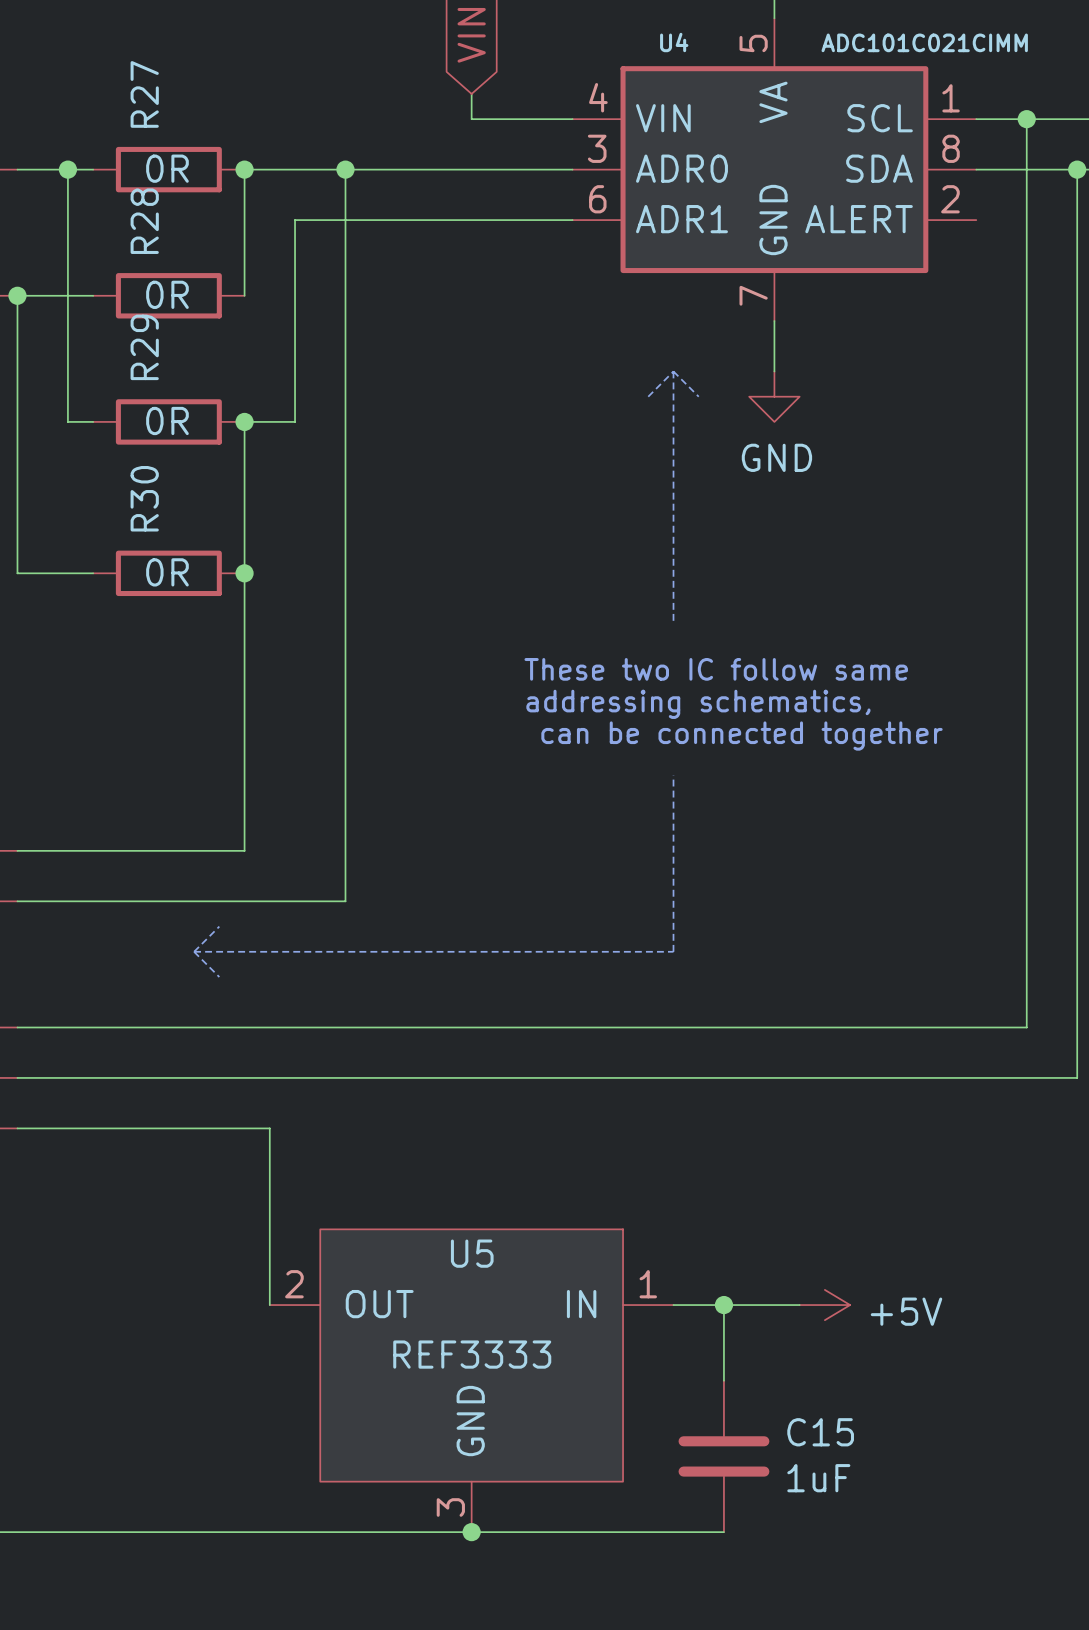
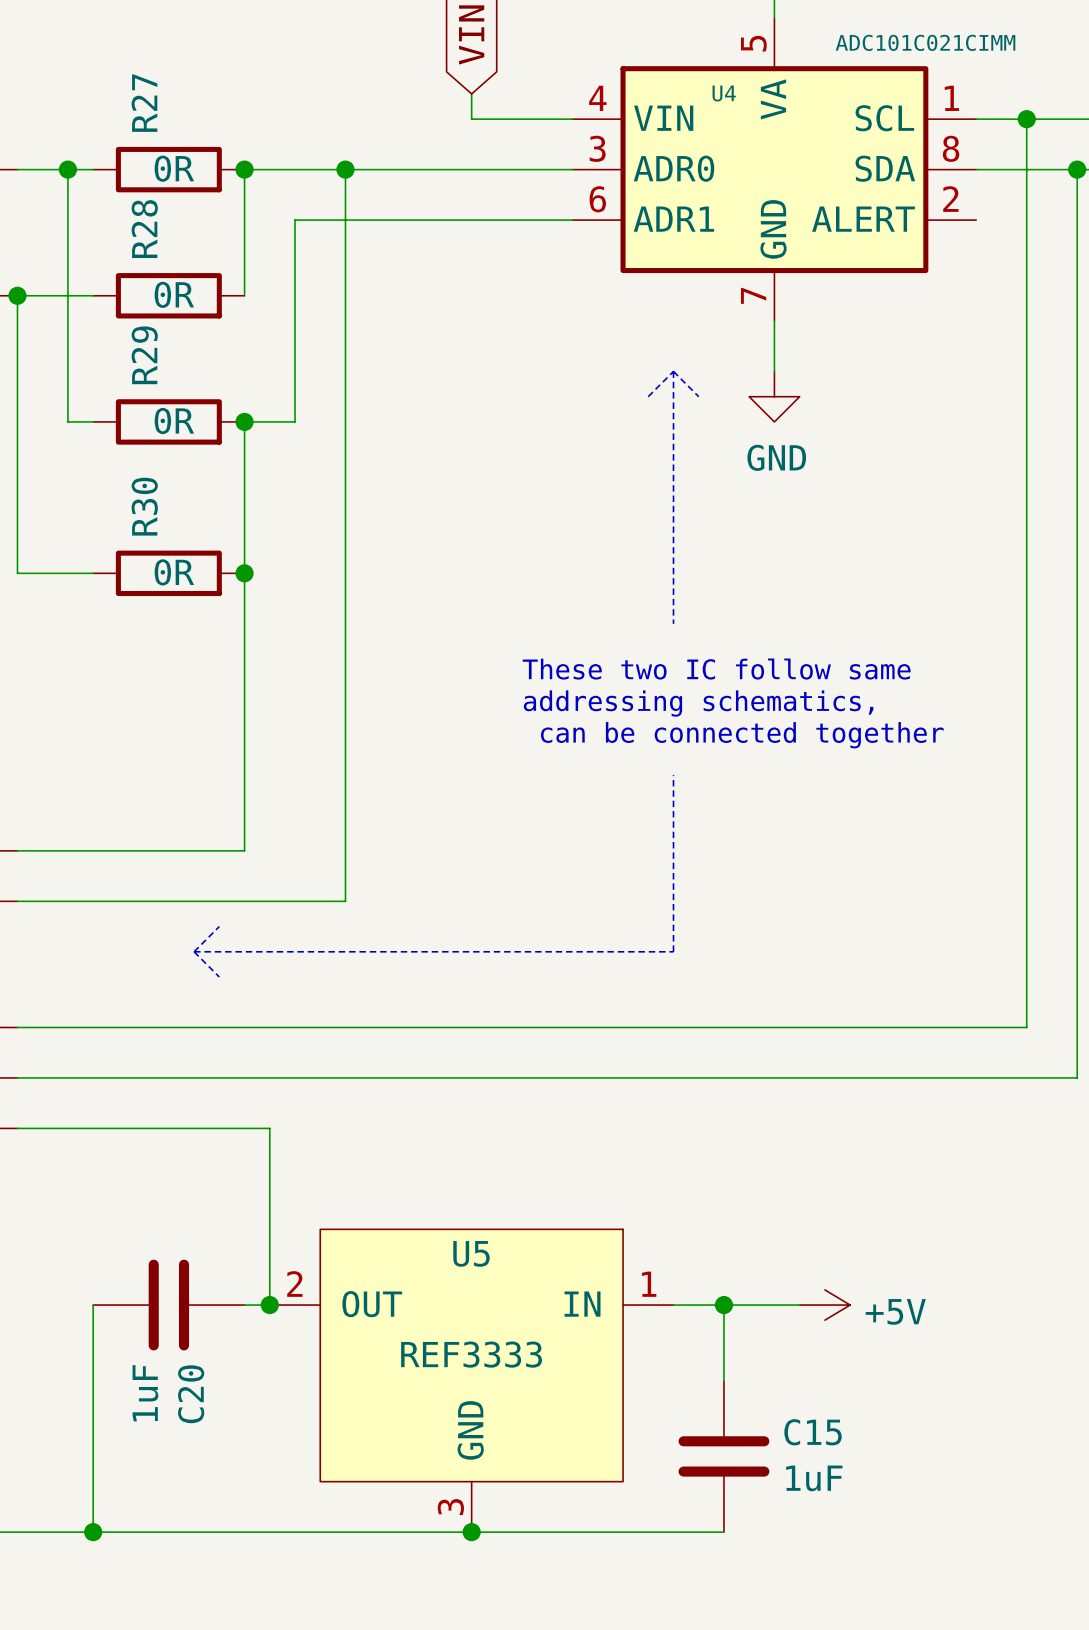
U4 name position: U4 (674, 42) -> U4 (724, 93)
wire: none -> (93, 1305) (93, 1532)
C20: none -> 1uF (168, 1305)
wire: none -> (244, 1305) (269, 1305)
junction: none -> (269, 1305)
junction: none -> (93, 1532)

